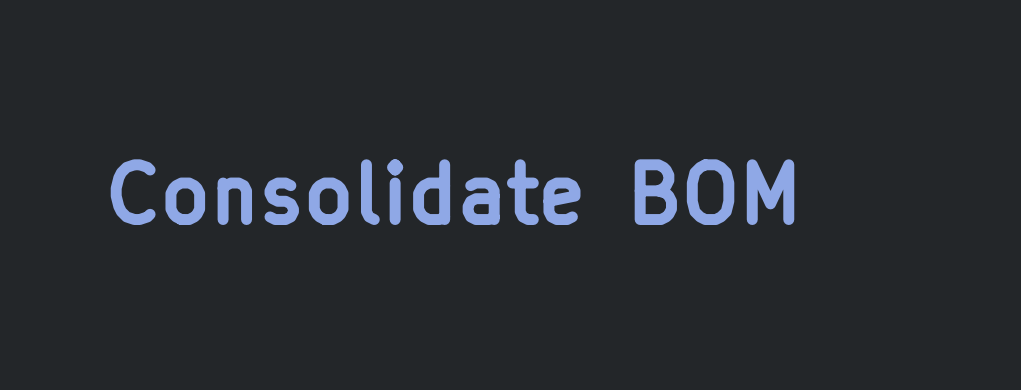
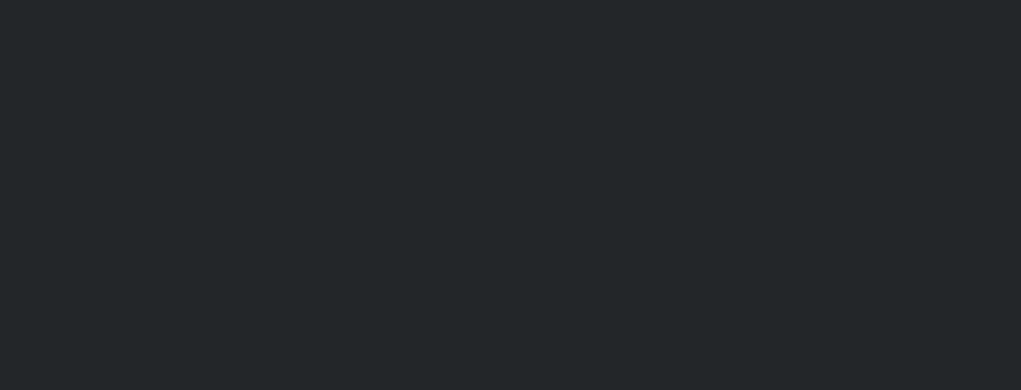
text: Consolidate BOM (452, 192) -> none

